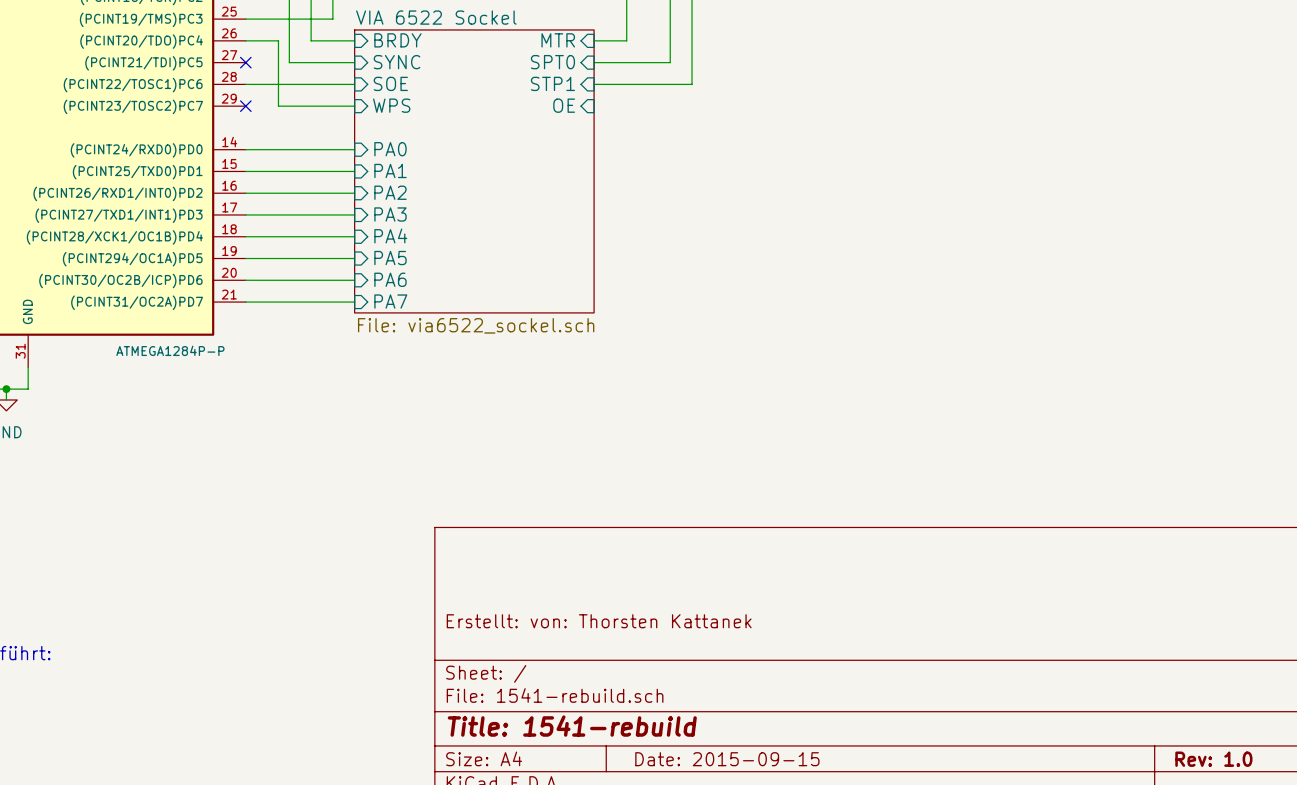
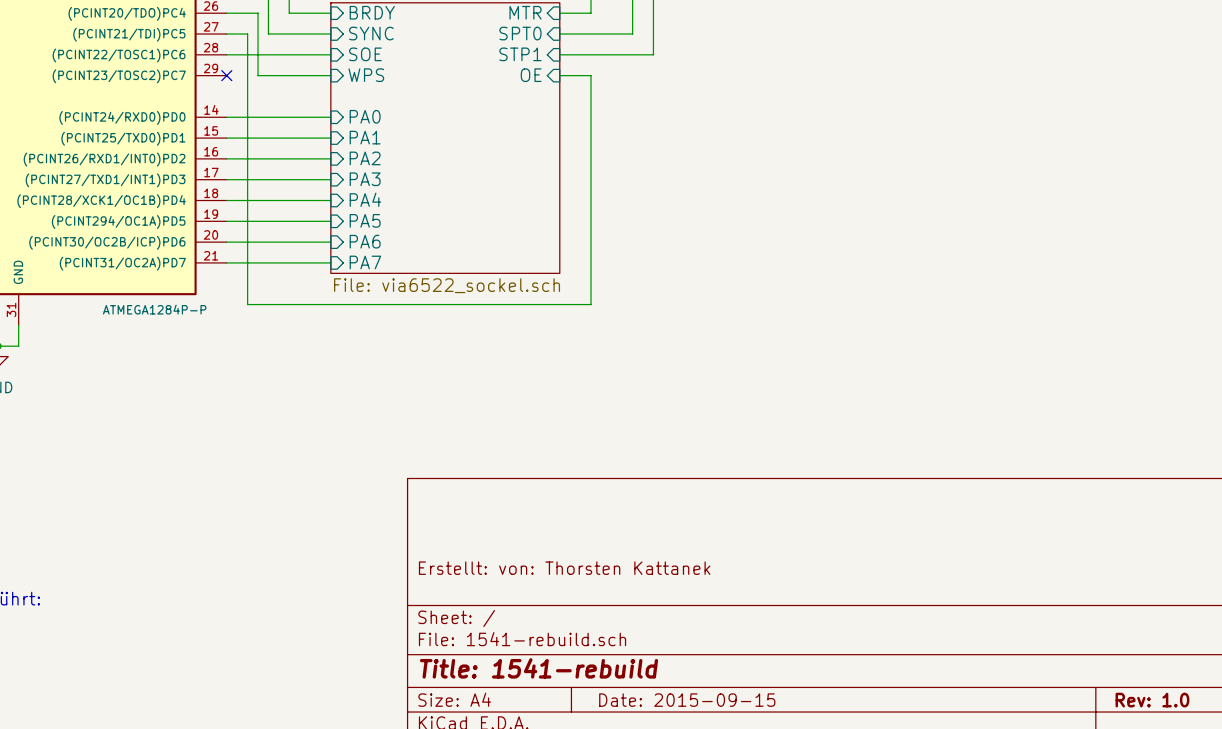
wire: none -> (226, 34) (247, 34) (247, 304) (591, 304) (591, 75) (559, 75)
no-connect mark: (245, 62) -> none

